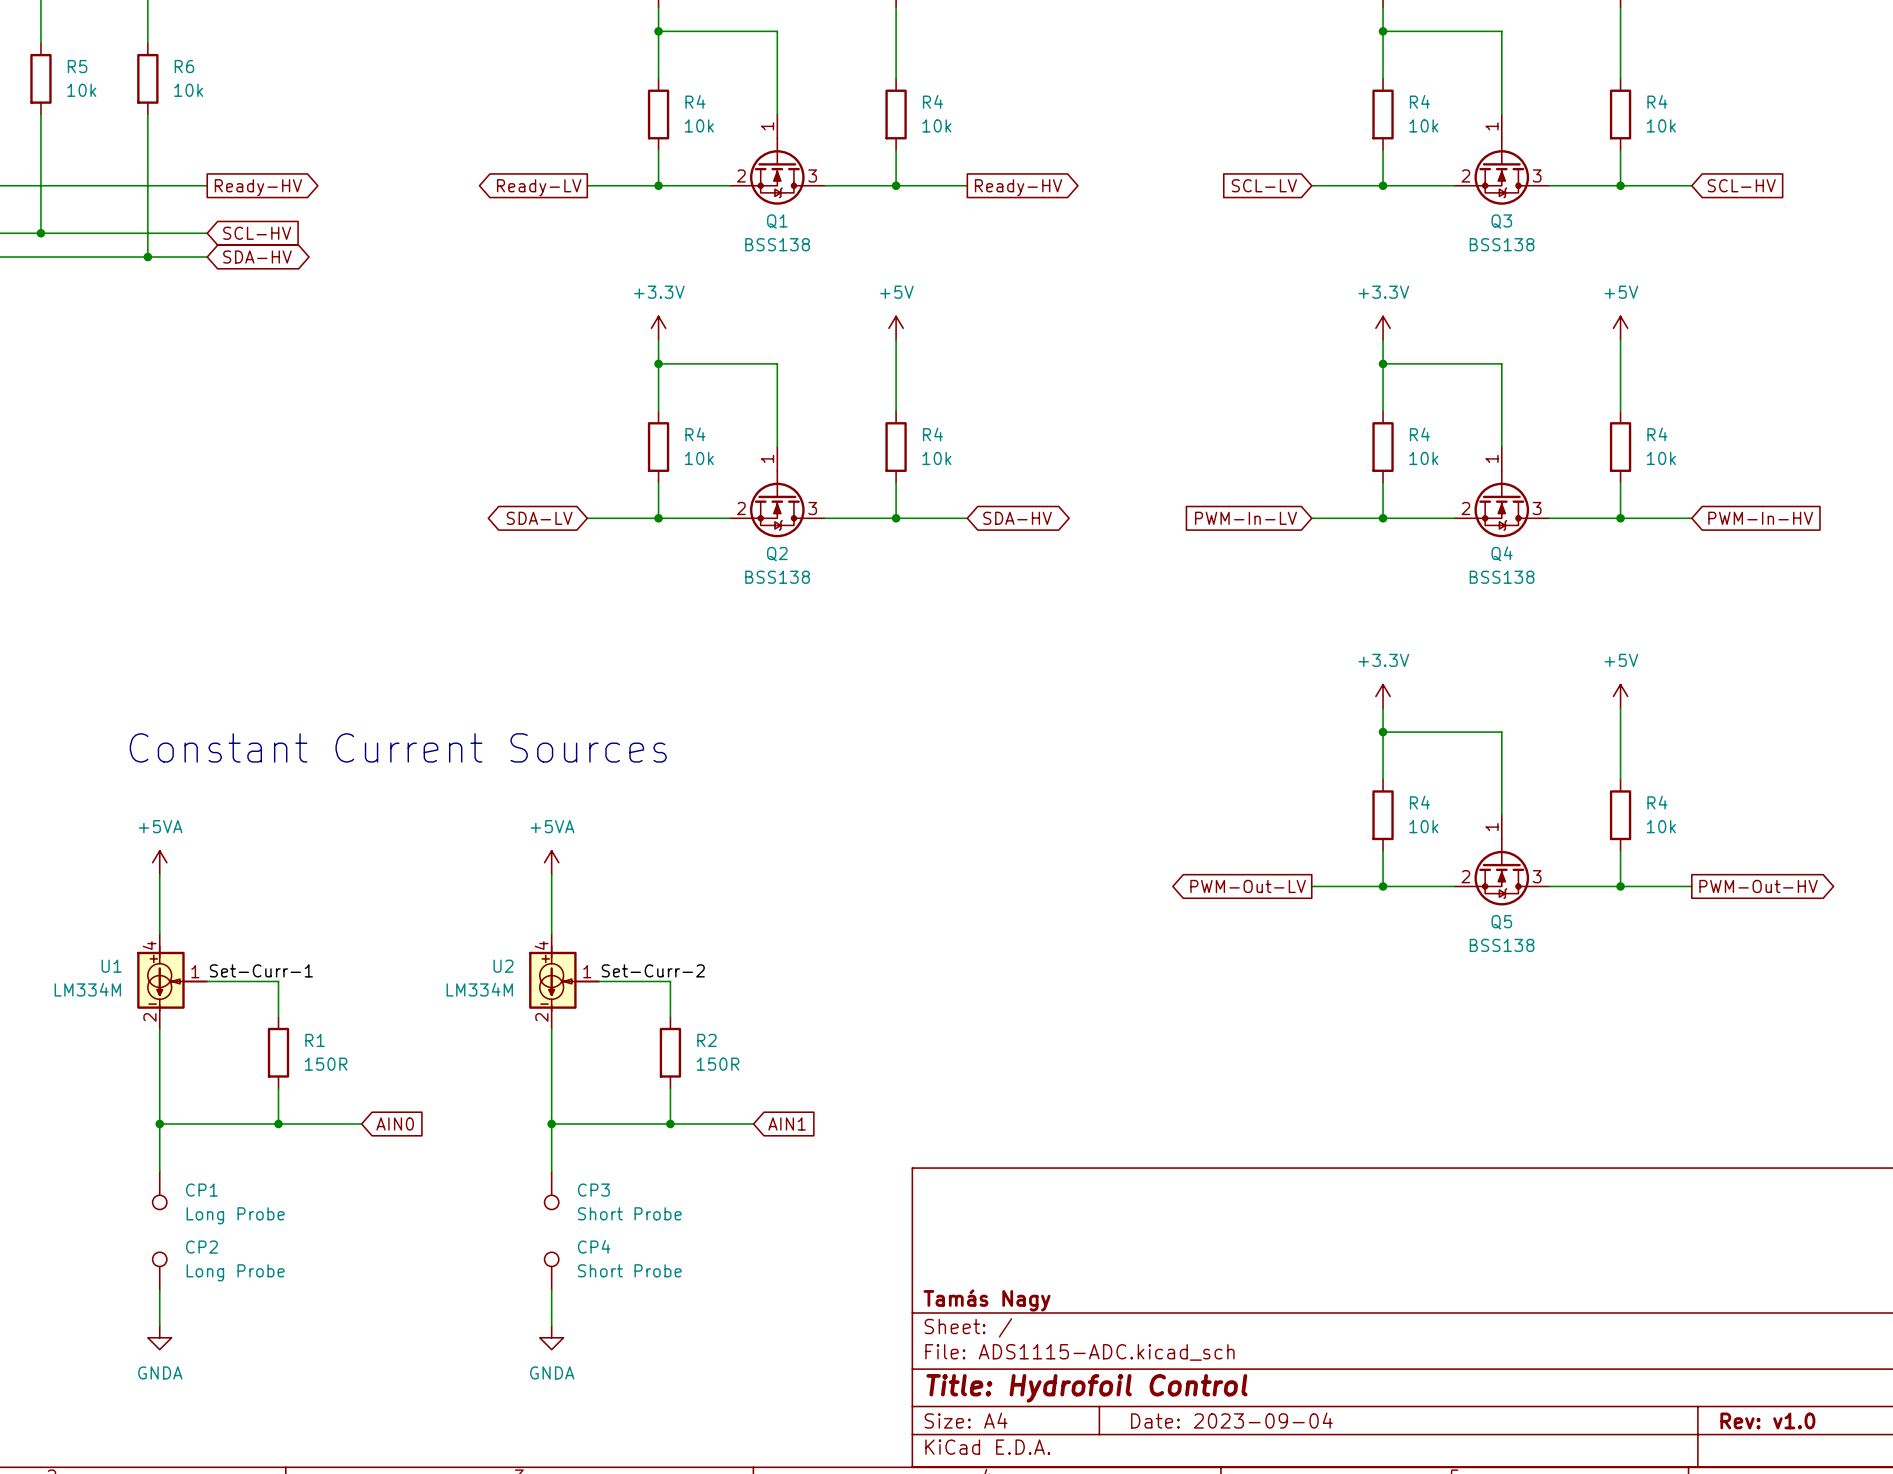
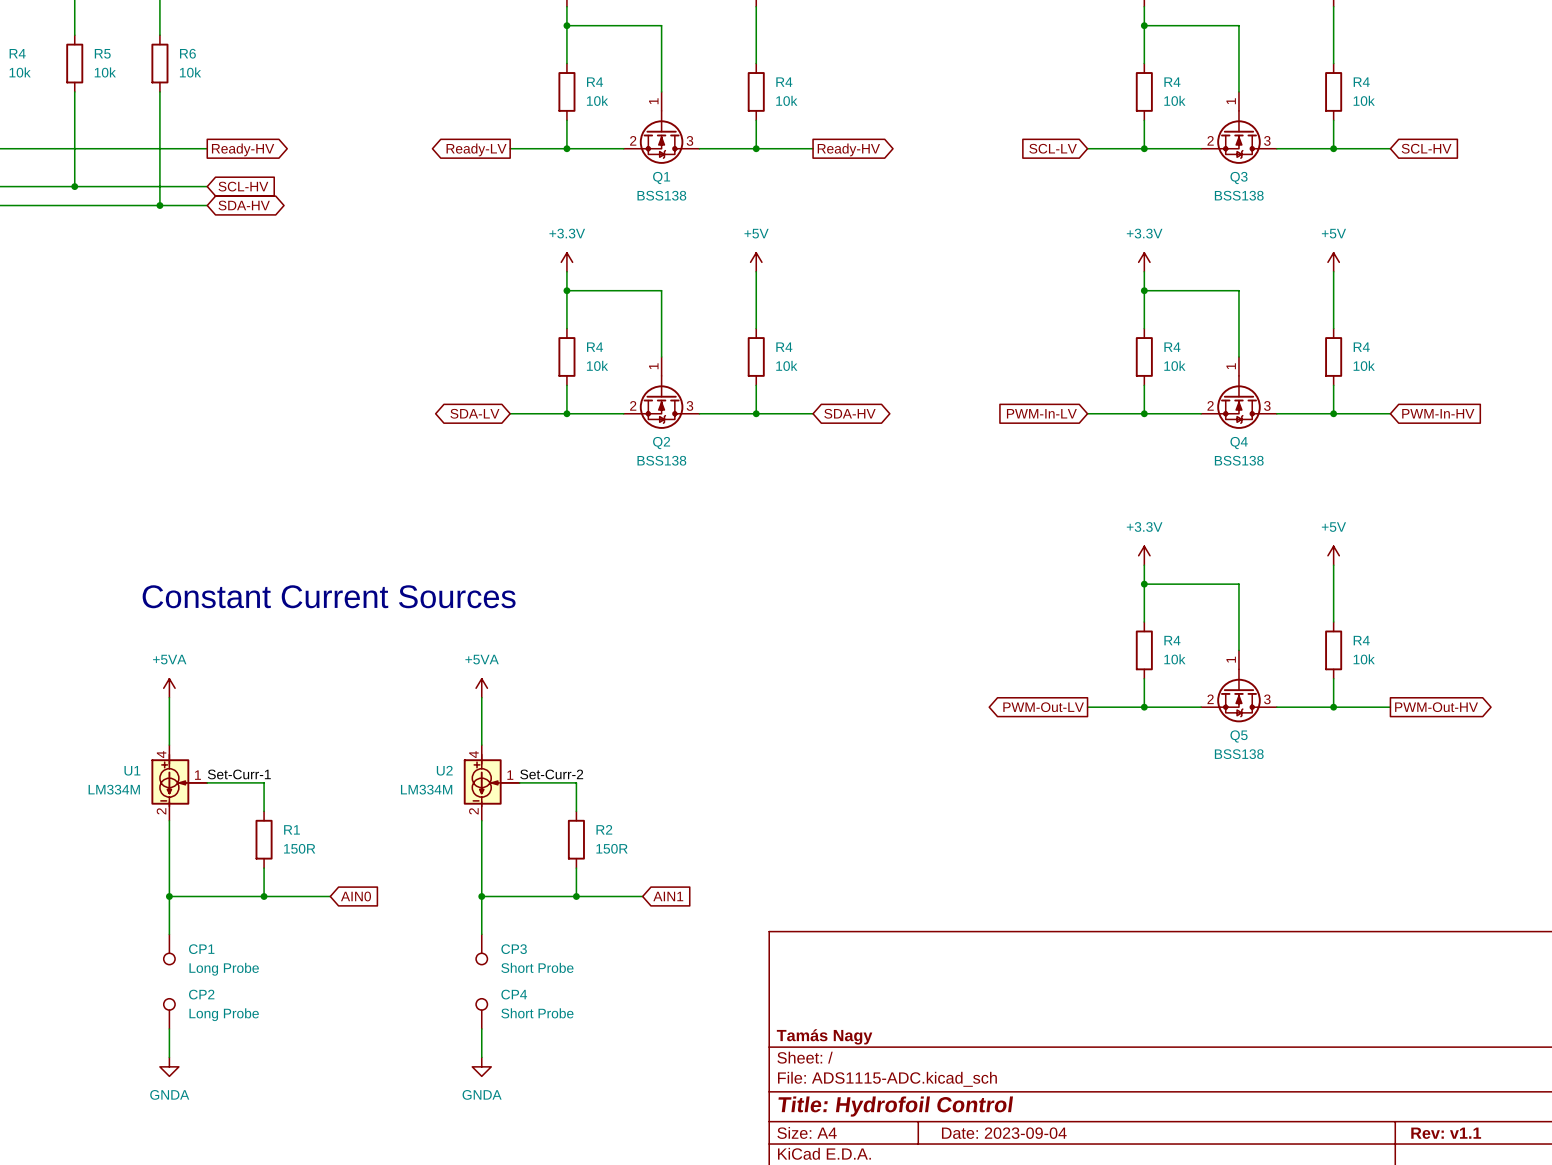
title block: Rev: v1.0 (1767, 1420) -> Rev: v1.1 (1446, 1133)

